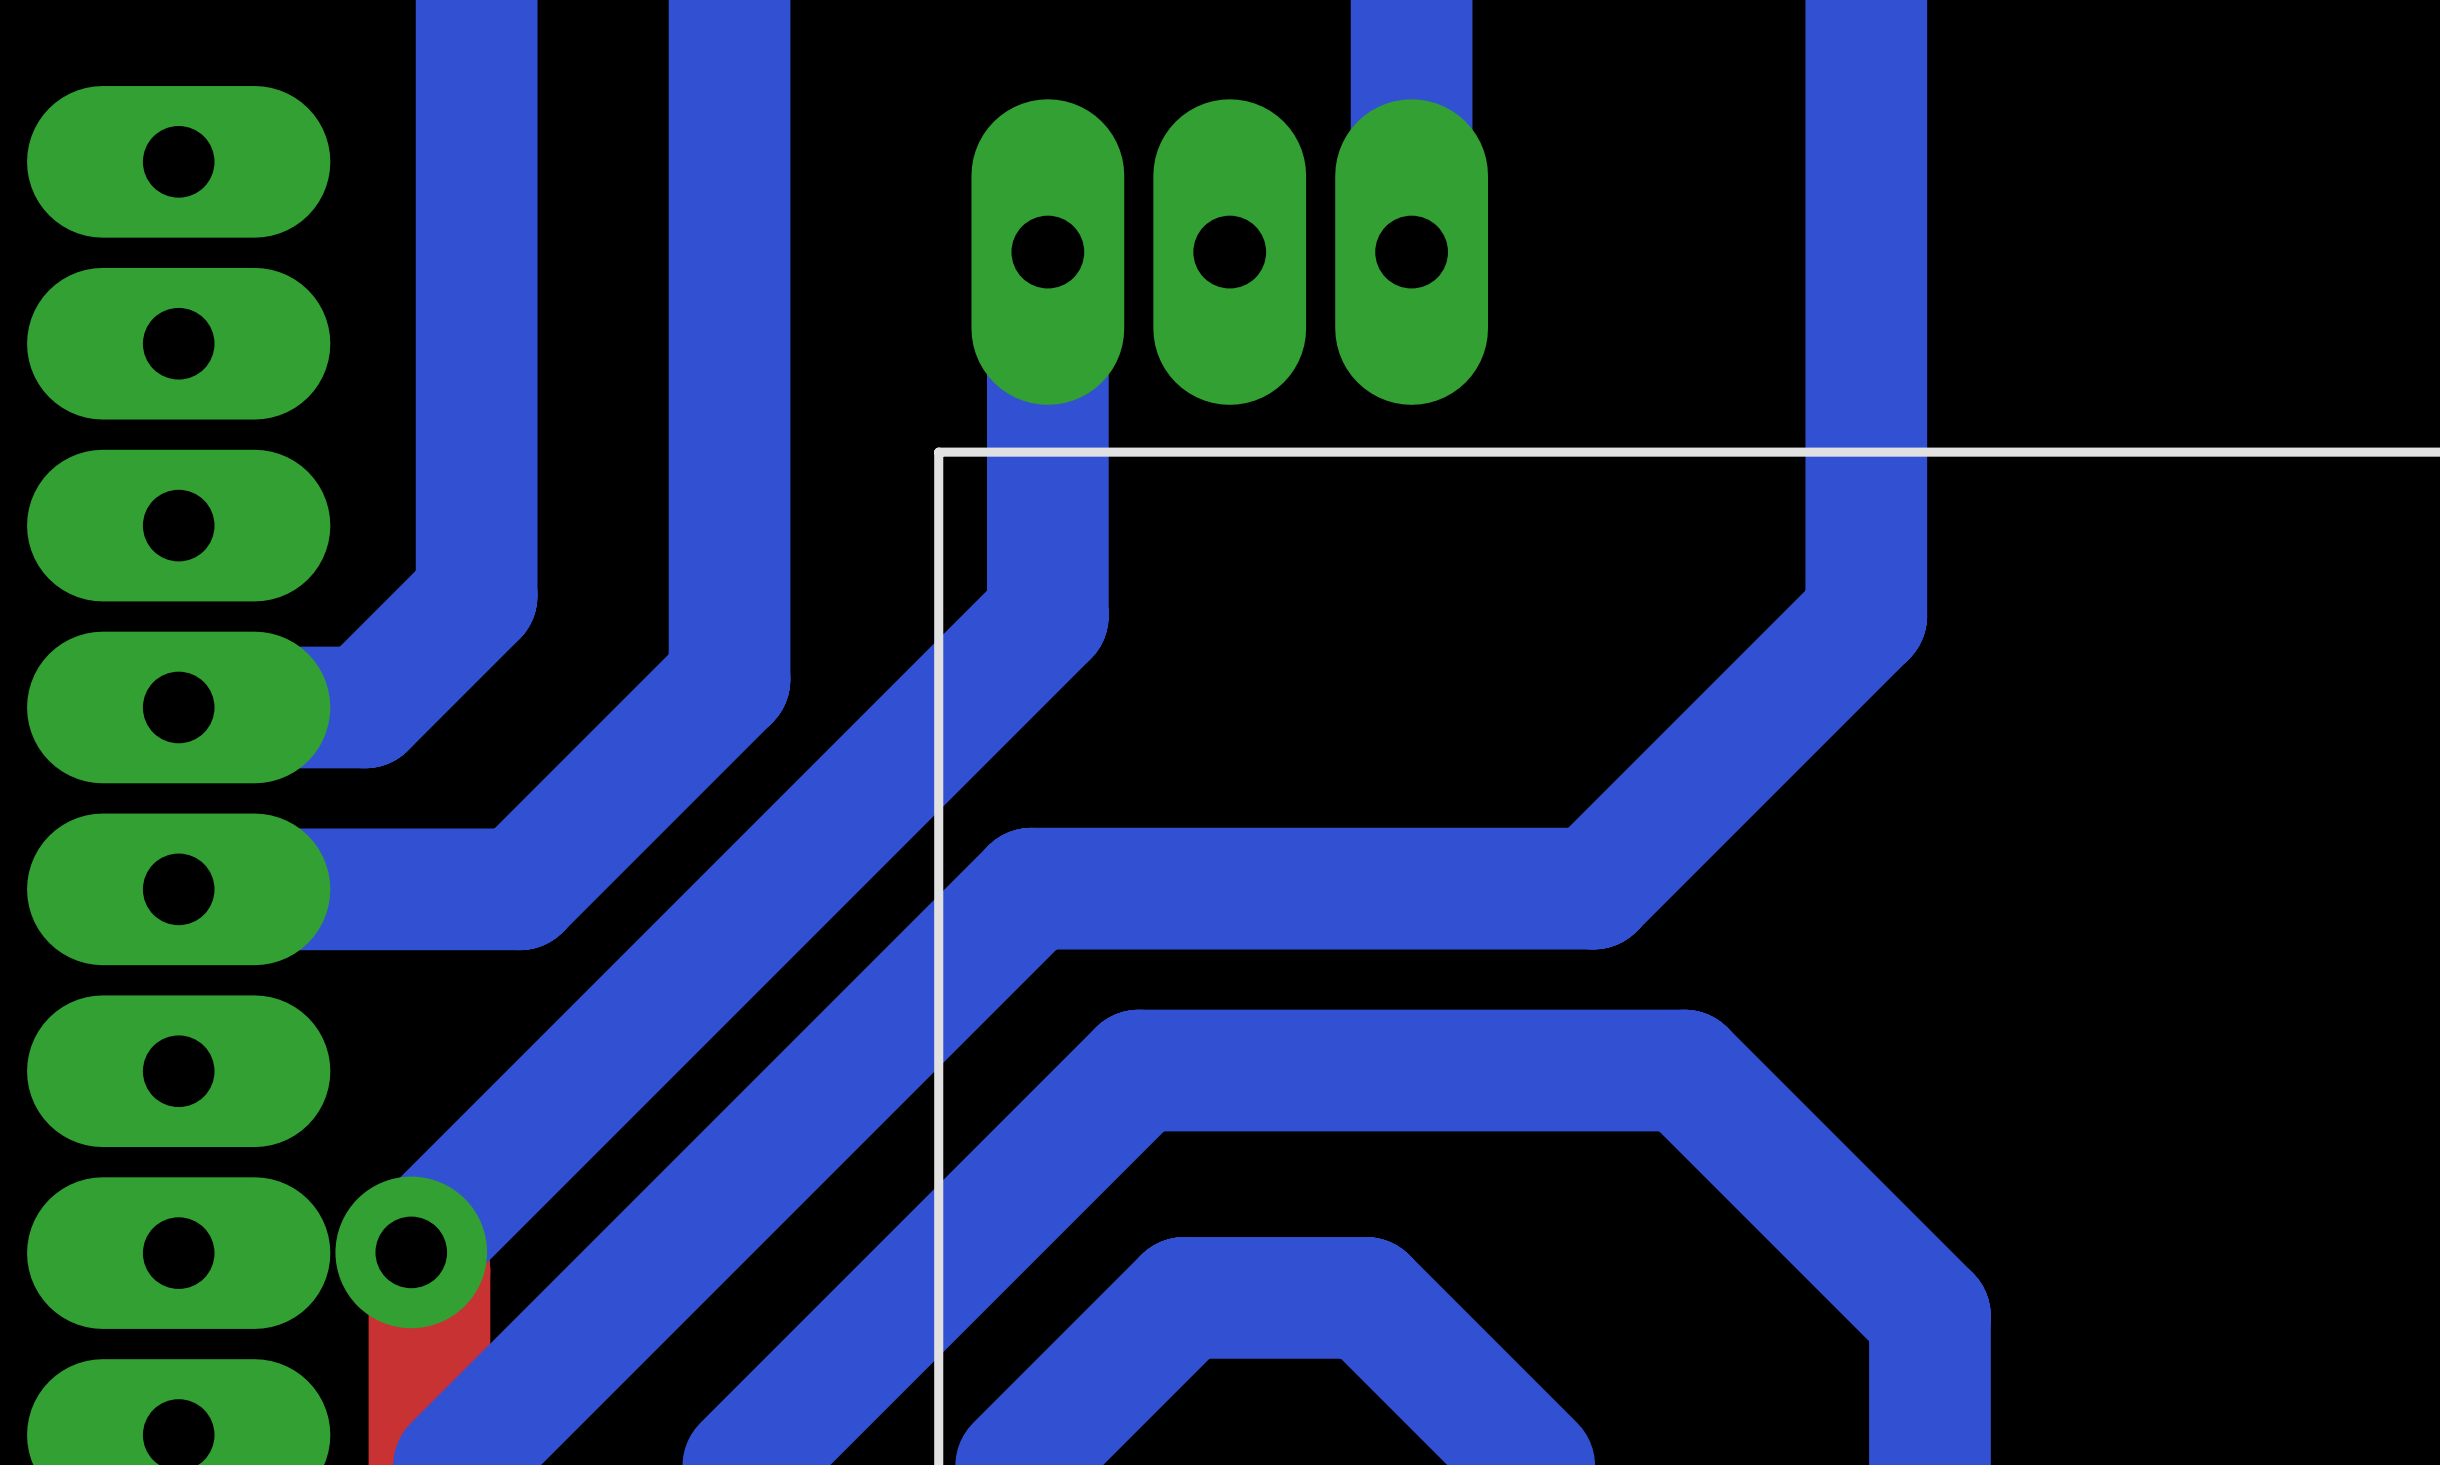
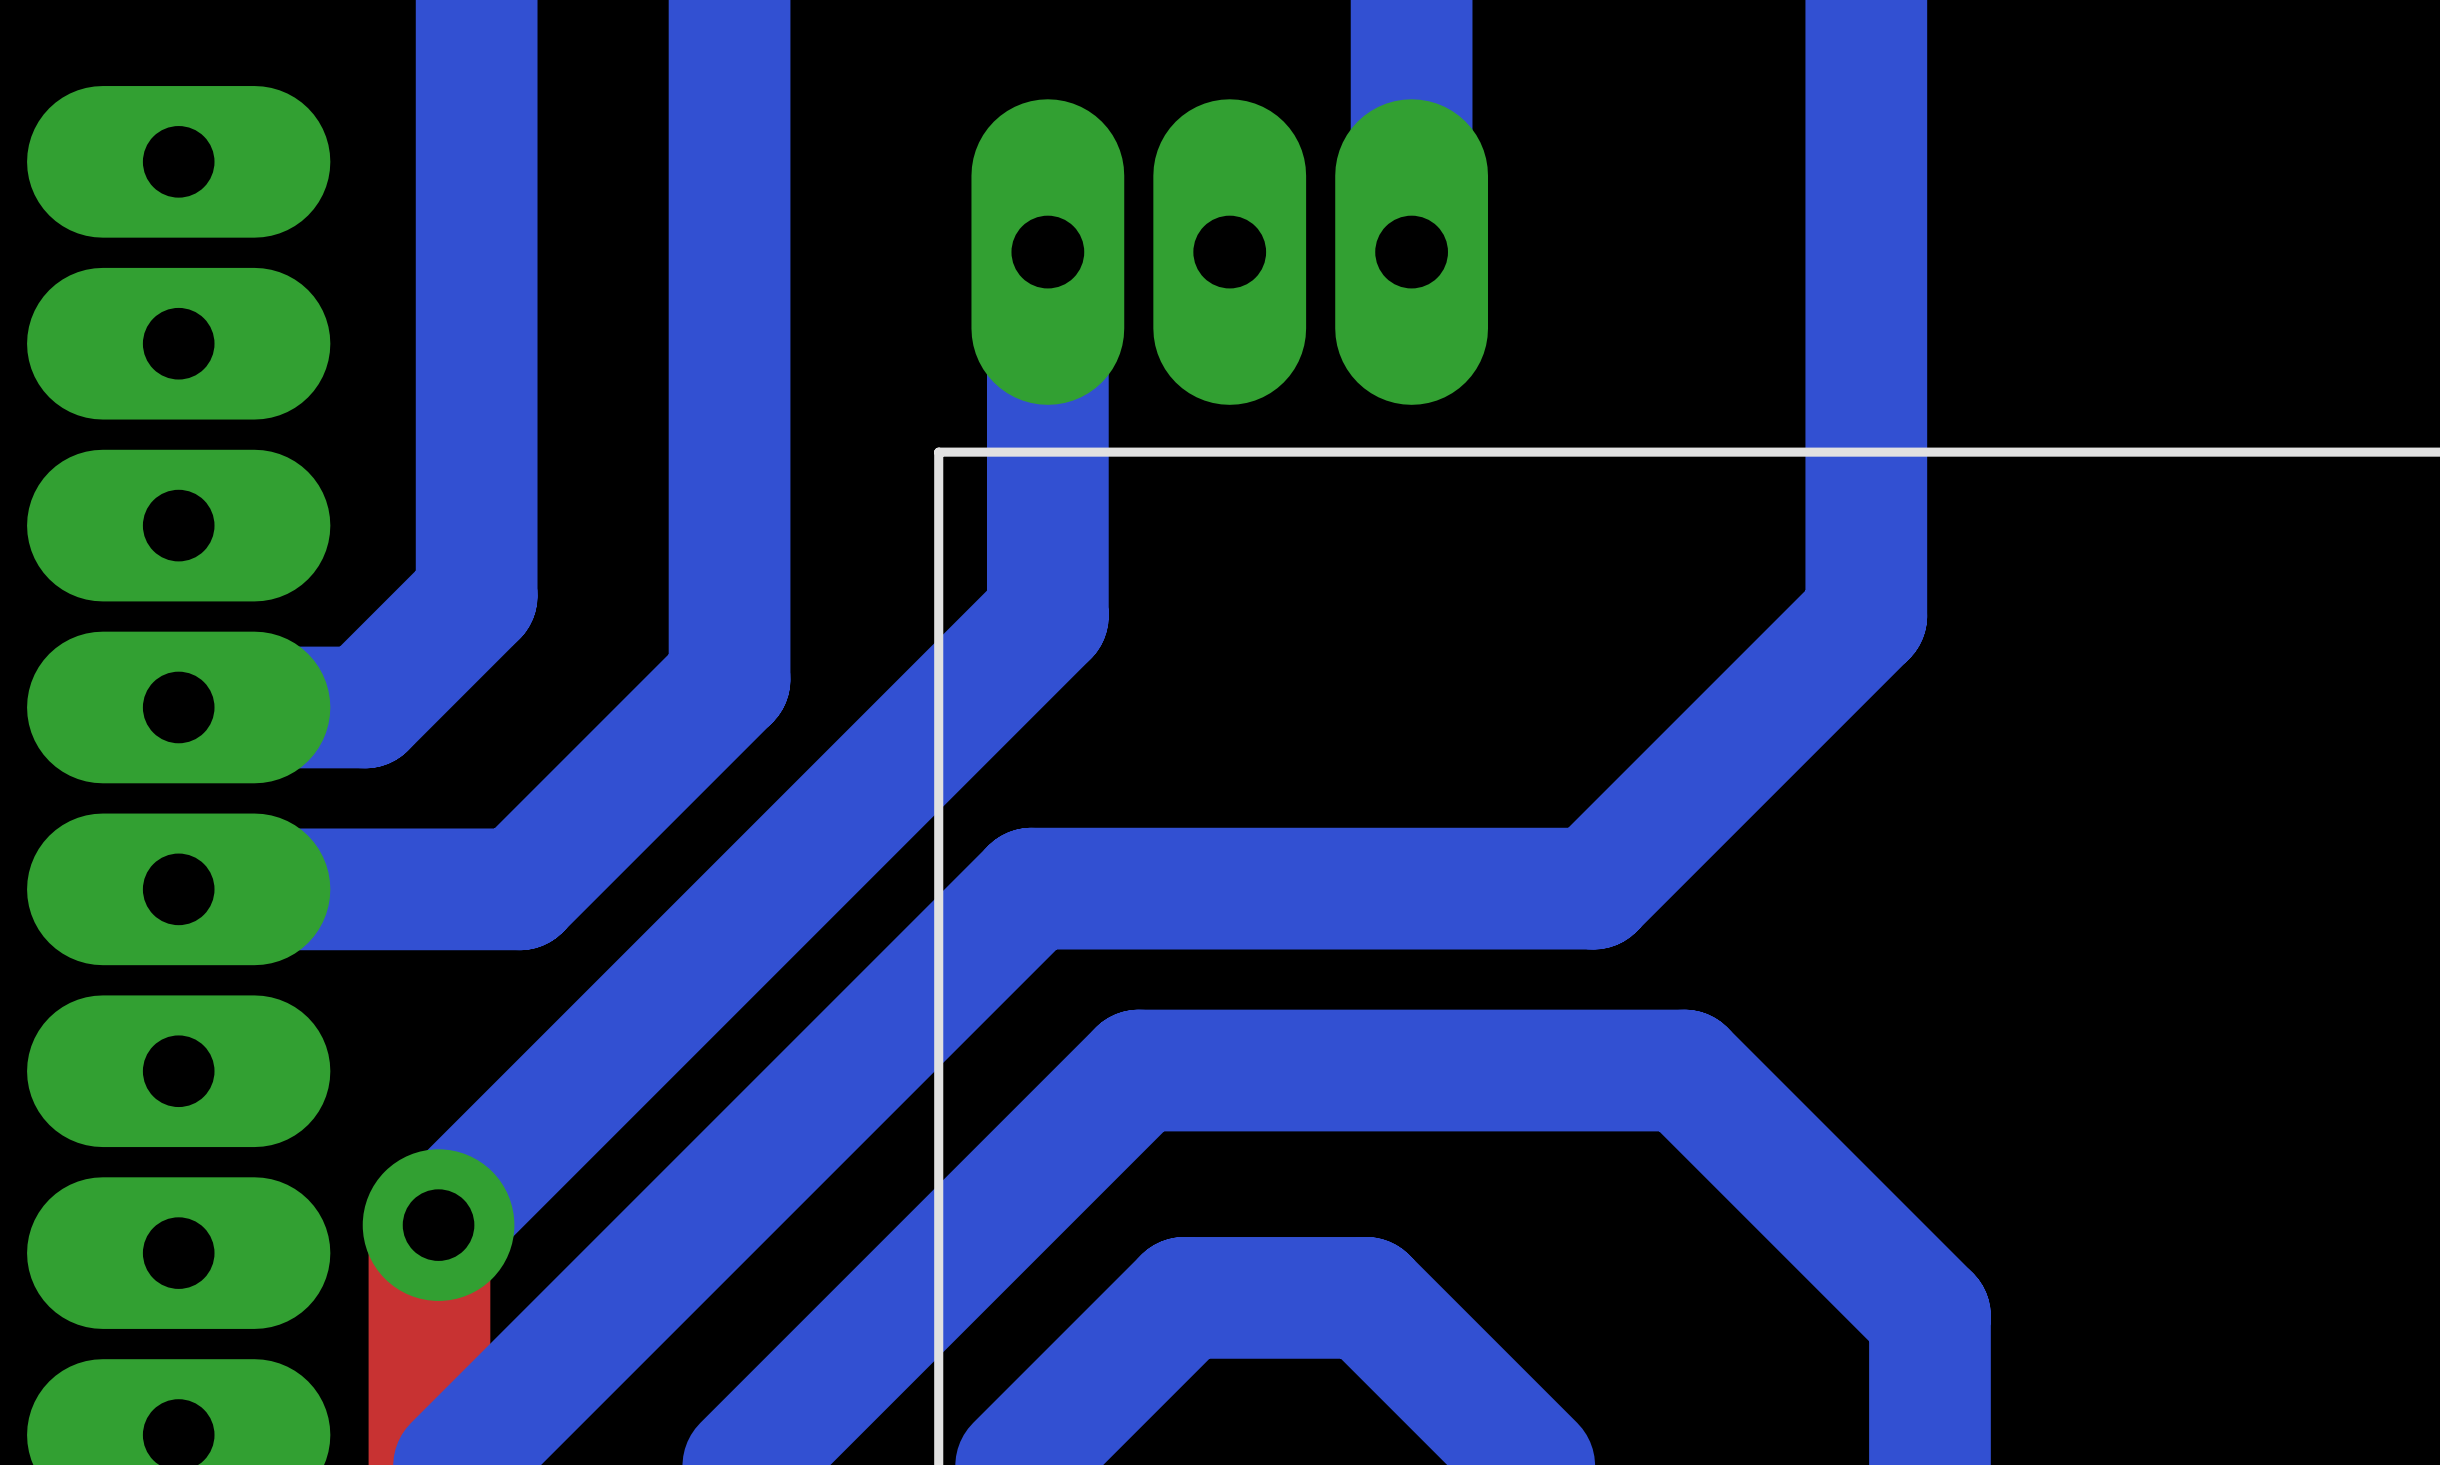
via position: (411, 1252) -> (438, 1225)

